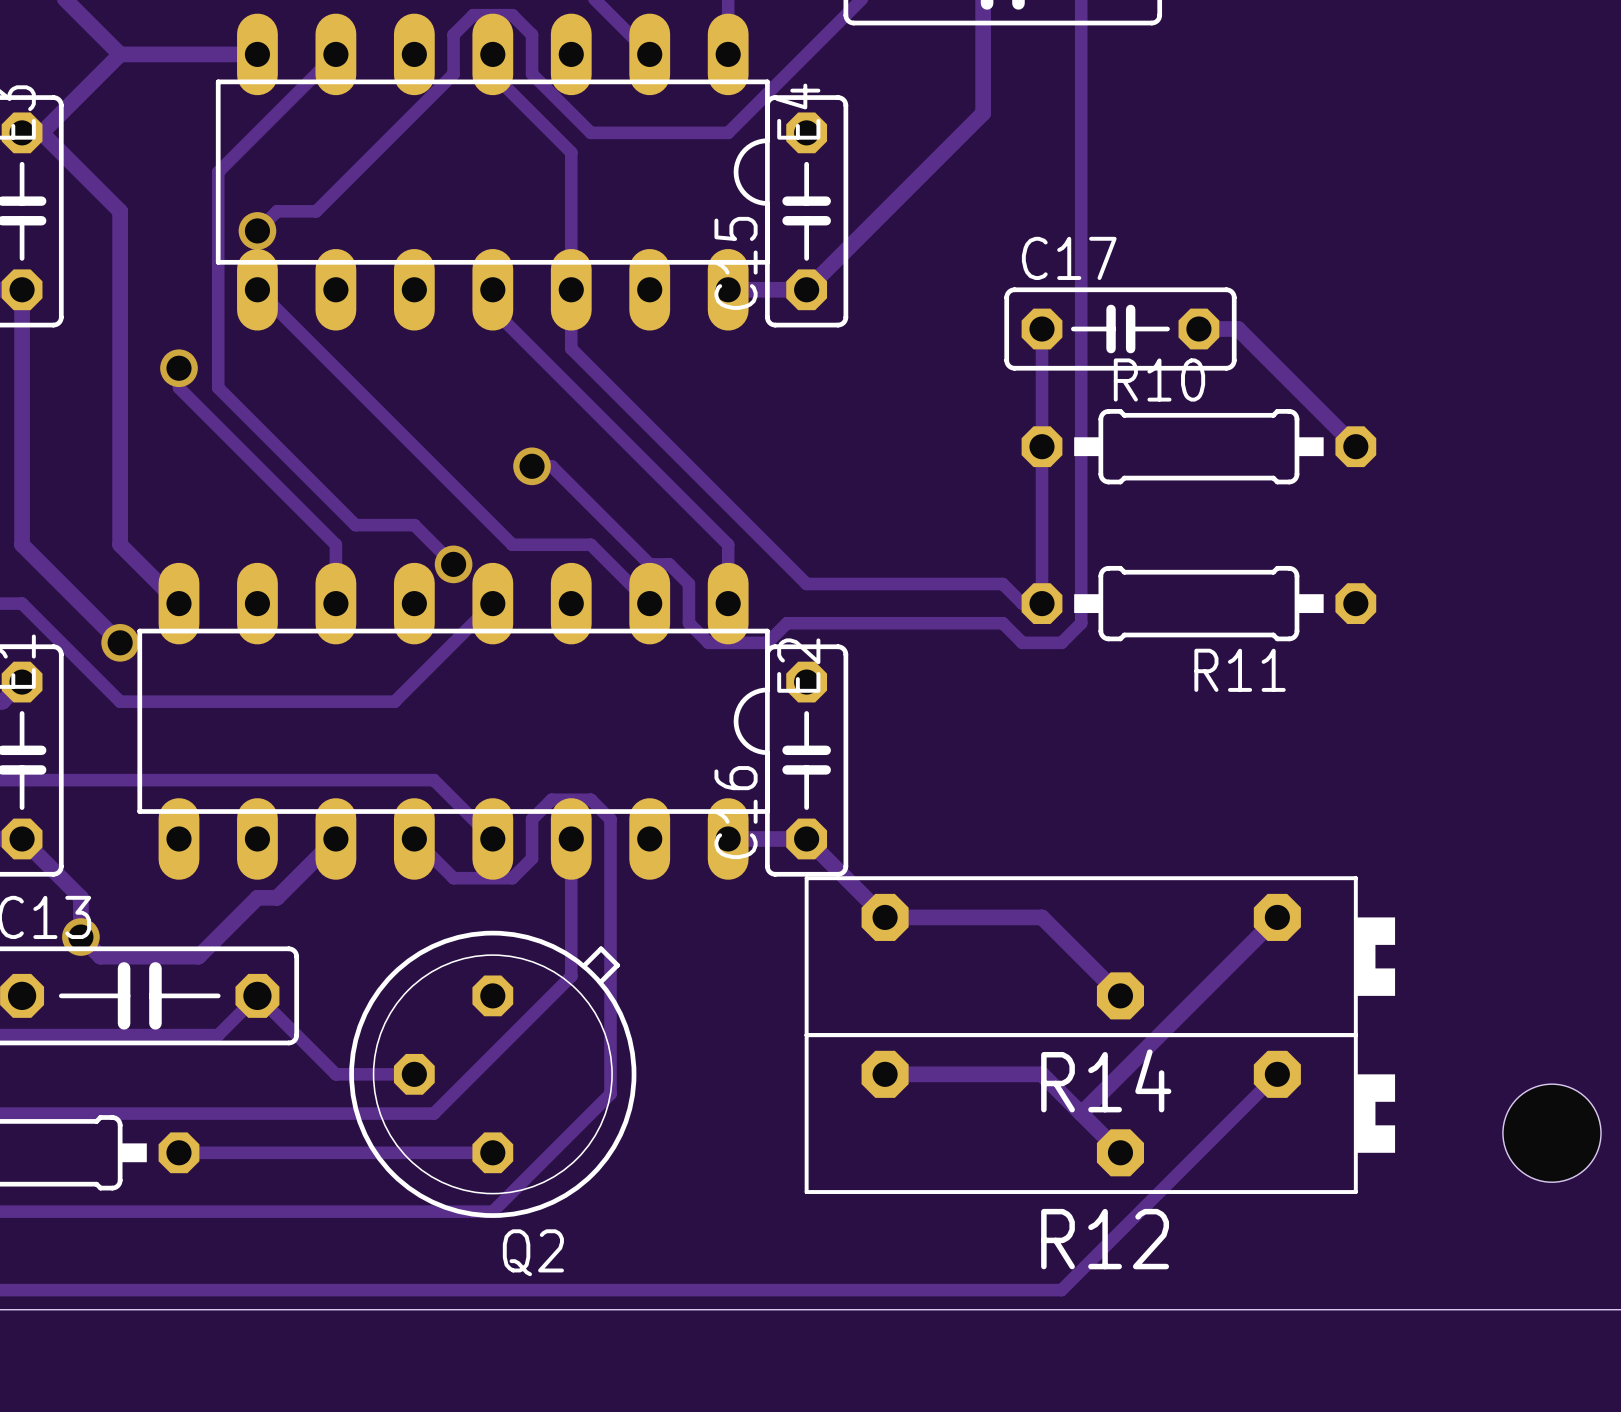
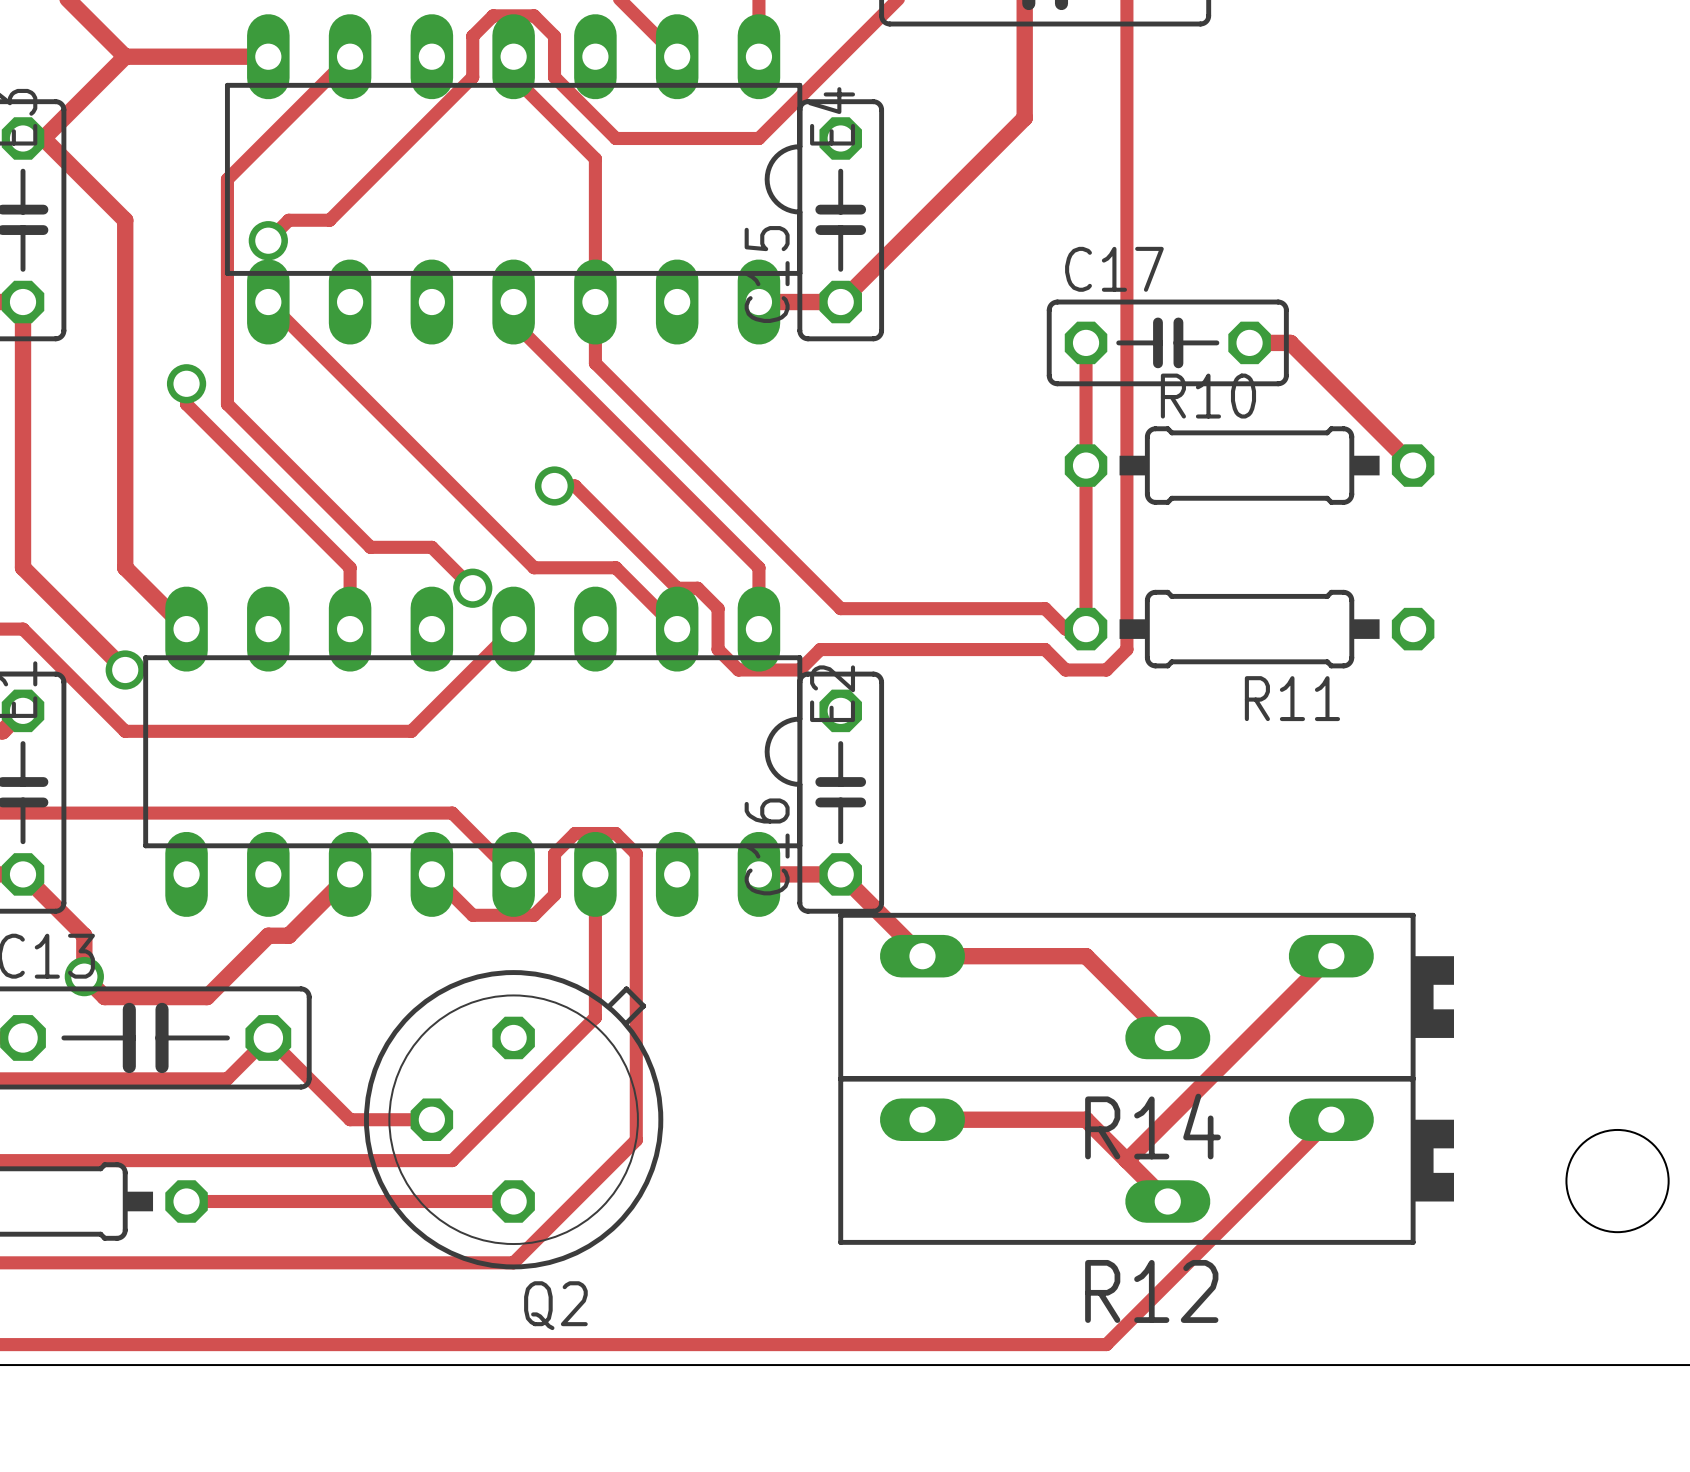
R14 footprint: [804, 876, 1396, 1038] -> [838, 912, 1455, 1082]
R12 footprint: [804, 1033, 1396, 1194] -> [838, 1076, 1455, 1245]

